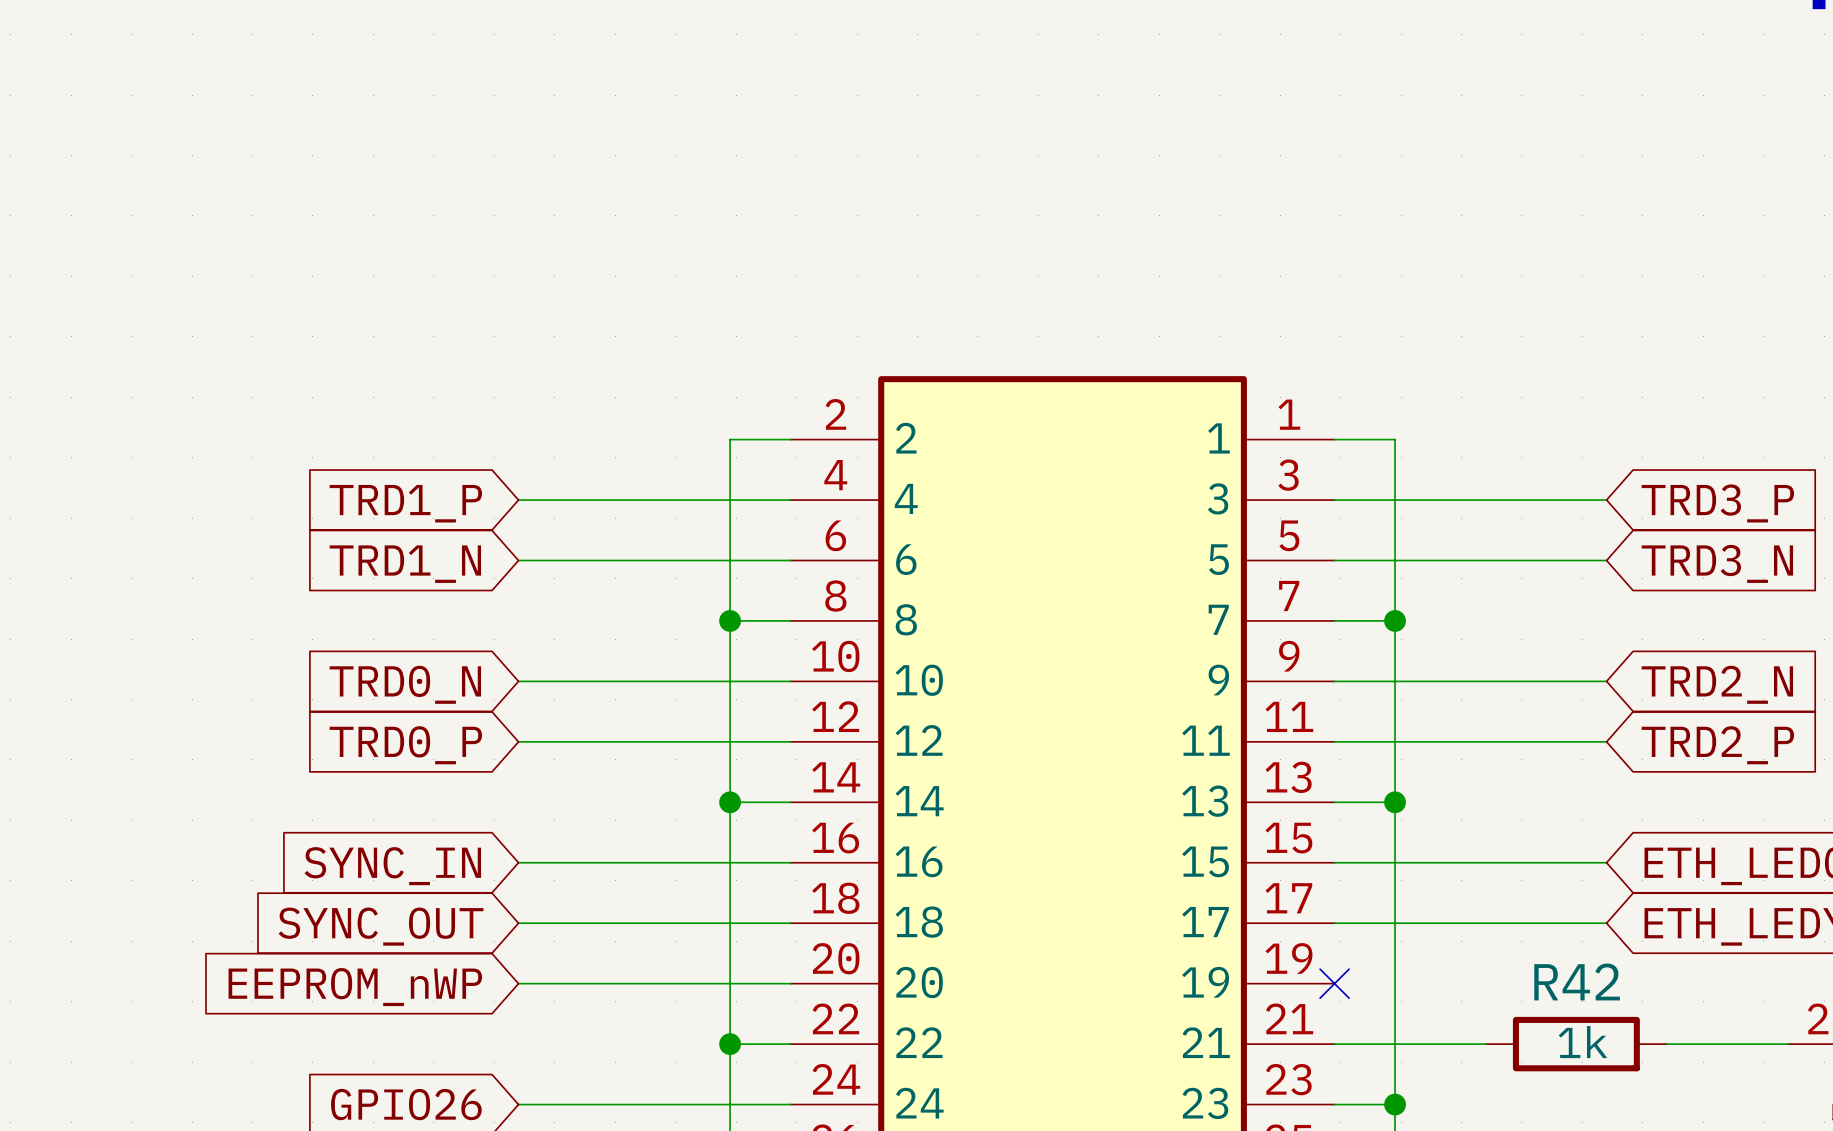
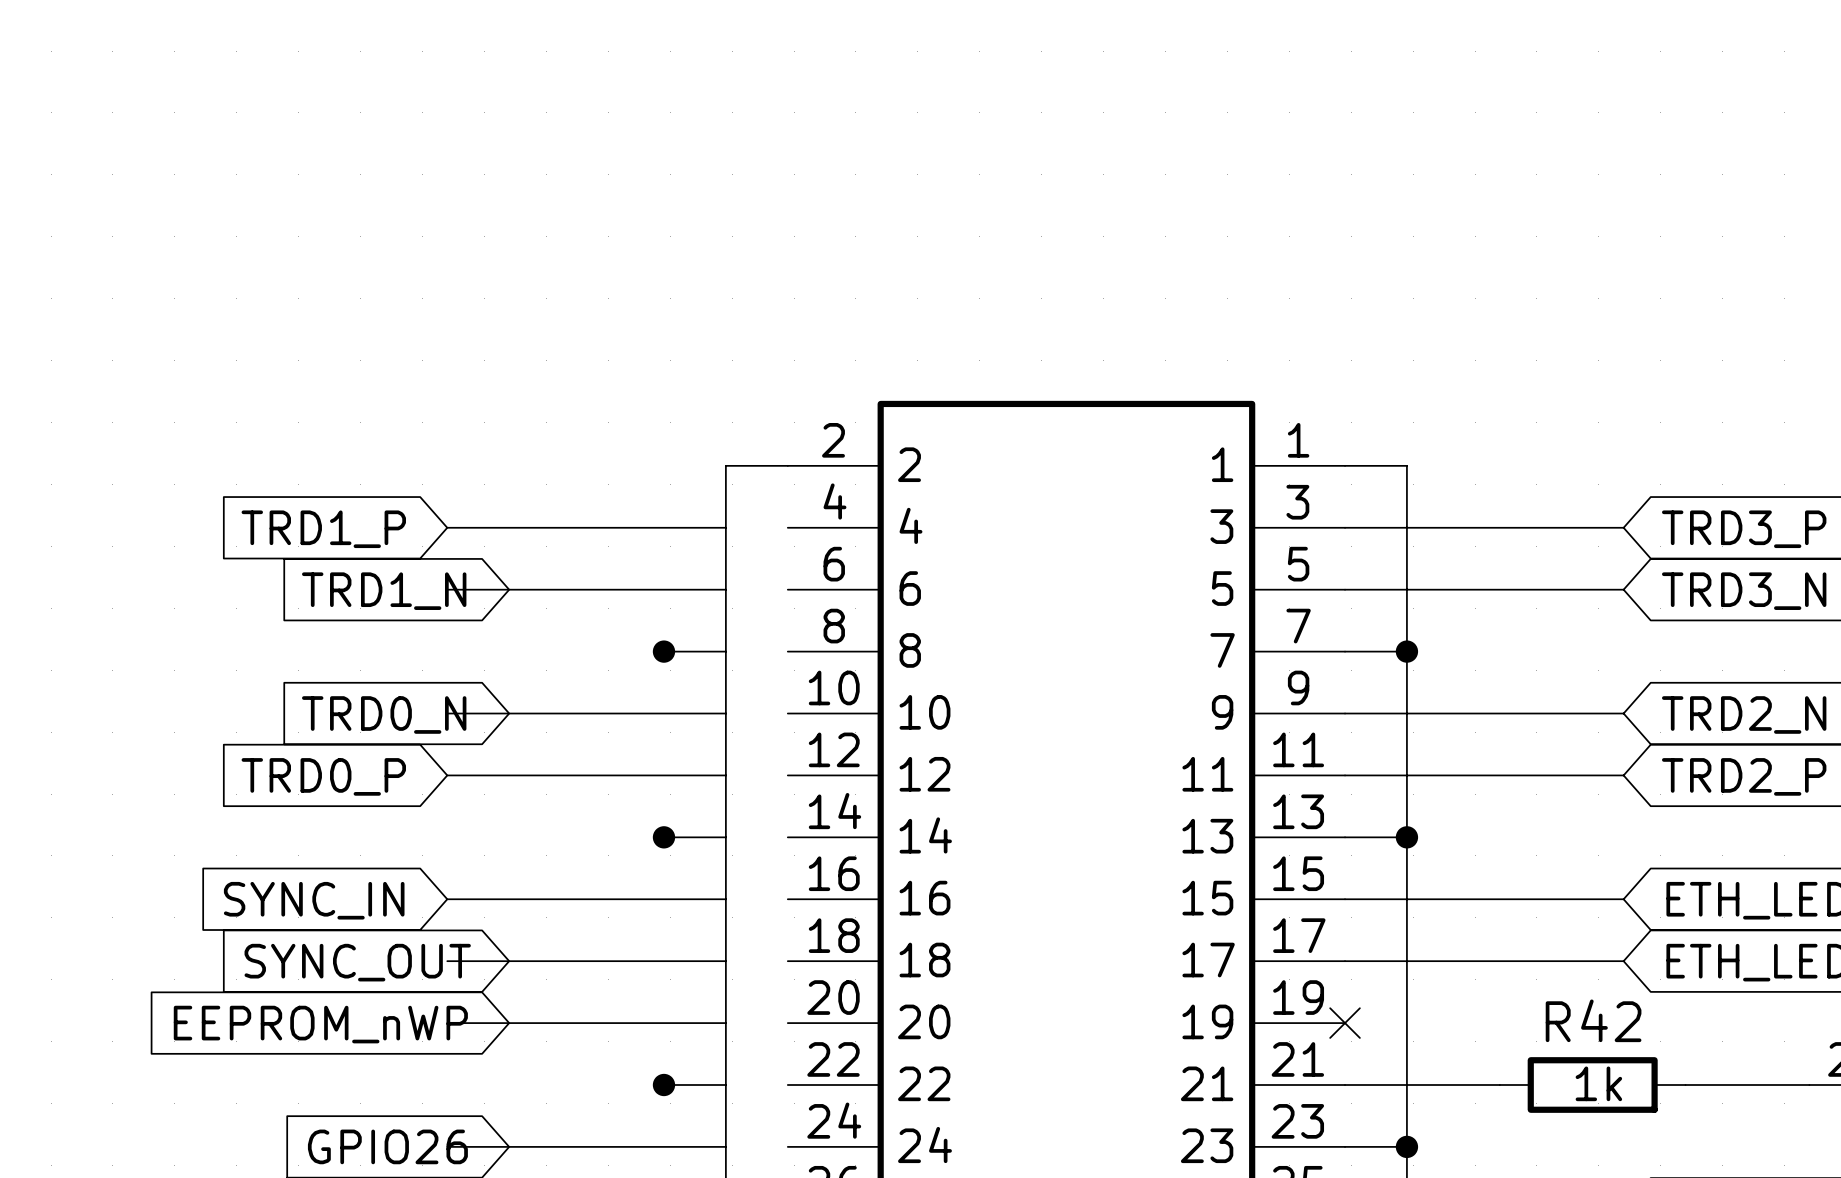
wire: (730, 500) (790, 500) -> (447, 527) (509, 527)
global label position: TRD1_P (405, 503) -> TRD1_P (323, 529)
wire: (730, 560) (790, 560) -> (447, 589) (509, 589)
wire: (730, 620) (790, 620) -> (725, 651) (663, 651)
junction position: (730, 620) -> (663, 651)
wire: (730, 681) (790, 681) -> (447, 713) (509, 713)
wire: (730, 741) (790, 741) -> (447, 775) (509, 775)
global label position: TRD0_P (405, 745) -> TRD0_P (323, 776)
wire: (730, 802) (790, 802) -> (725, 837) (663, 837)
junction position: (730, 802) -> (663, 837)
wire: (730, 862) (790, 862) -> (447, 899) (509, 899)
global label position: SYNC_IN (392, 866) -> SYNC_IN (314, 900)
wire: (730, 923) (790, 923) -> (447, 961) (509, 961)
wire: (730, 983) (790, 983) -> (447, 1023) (509, 1023)
wire: (730, 1044) (790, 1044) -> (725, 1084) (663, 1084)
junction position: (730, 1044) -> (663, 1084)
wire: (730, 1104) (790, 1104) -> (447, 1146) (509, 1146)

